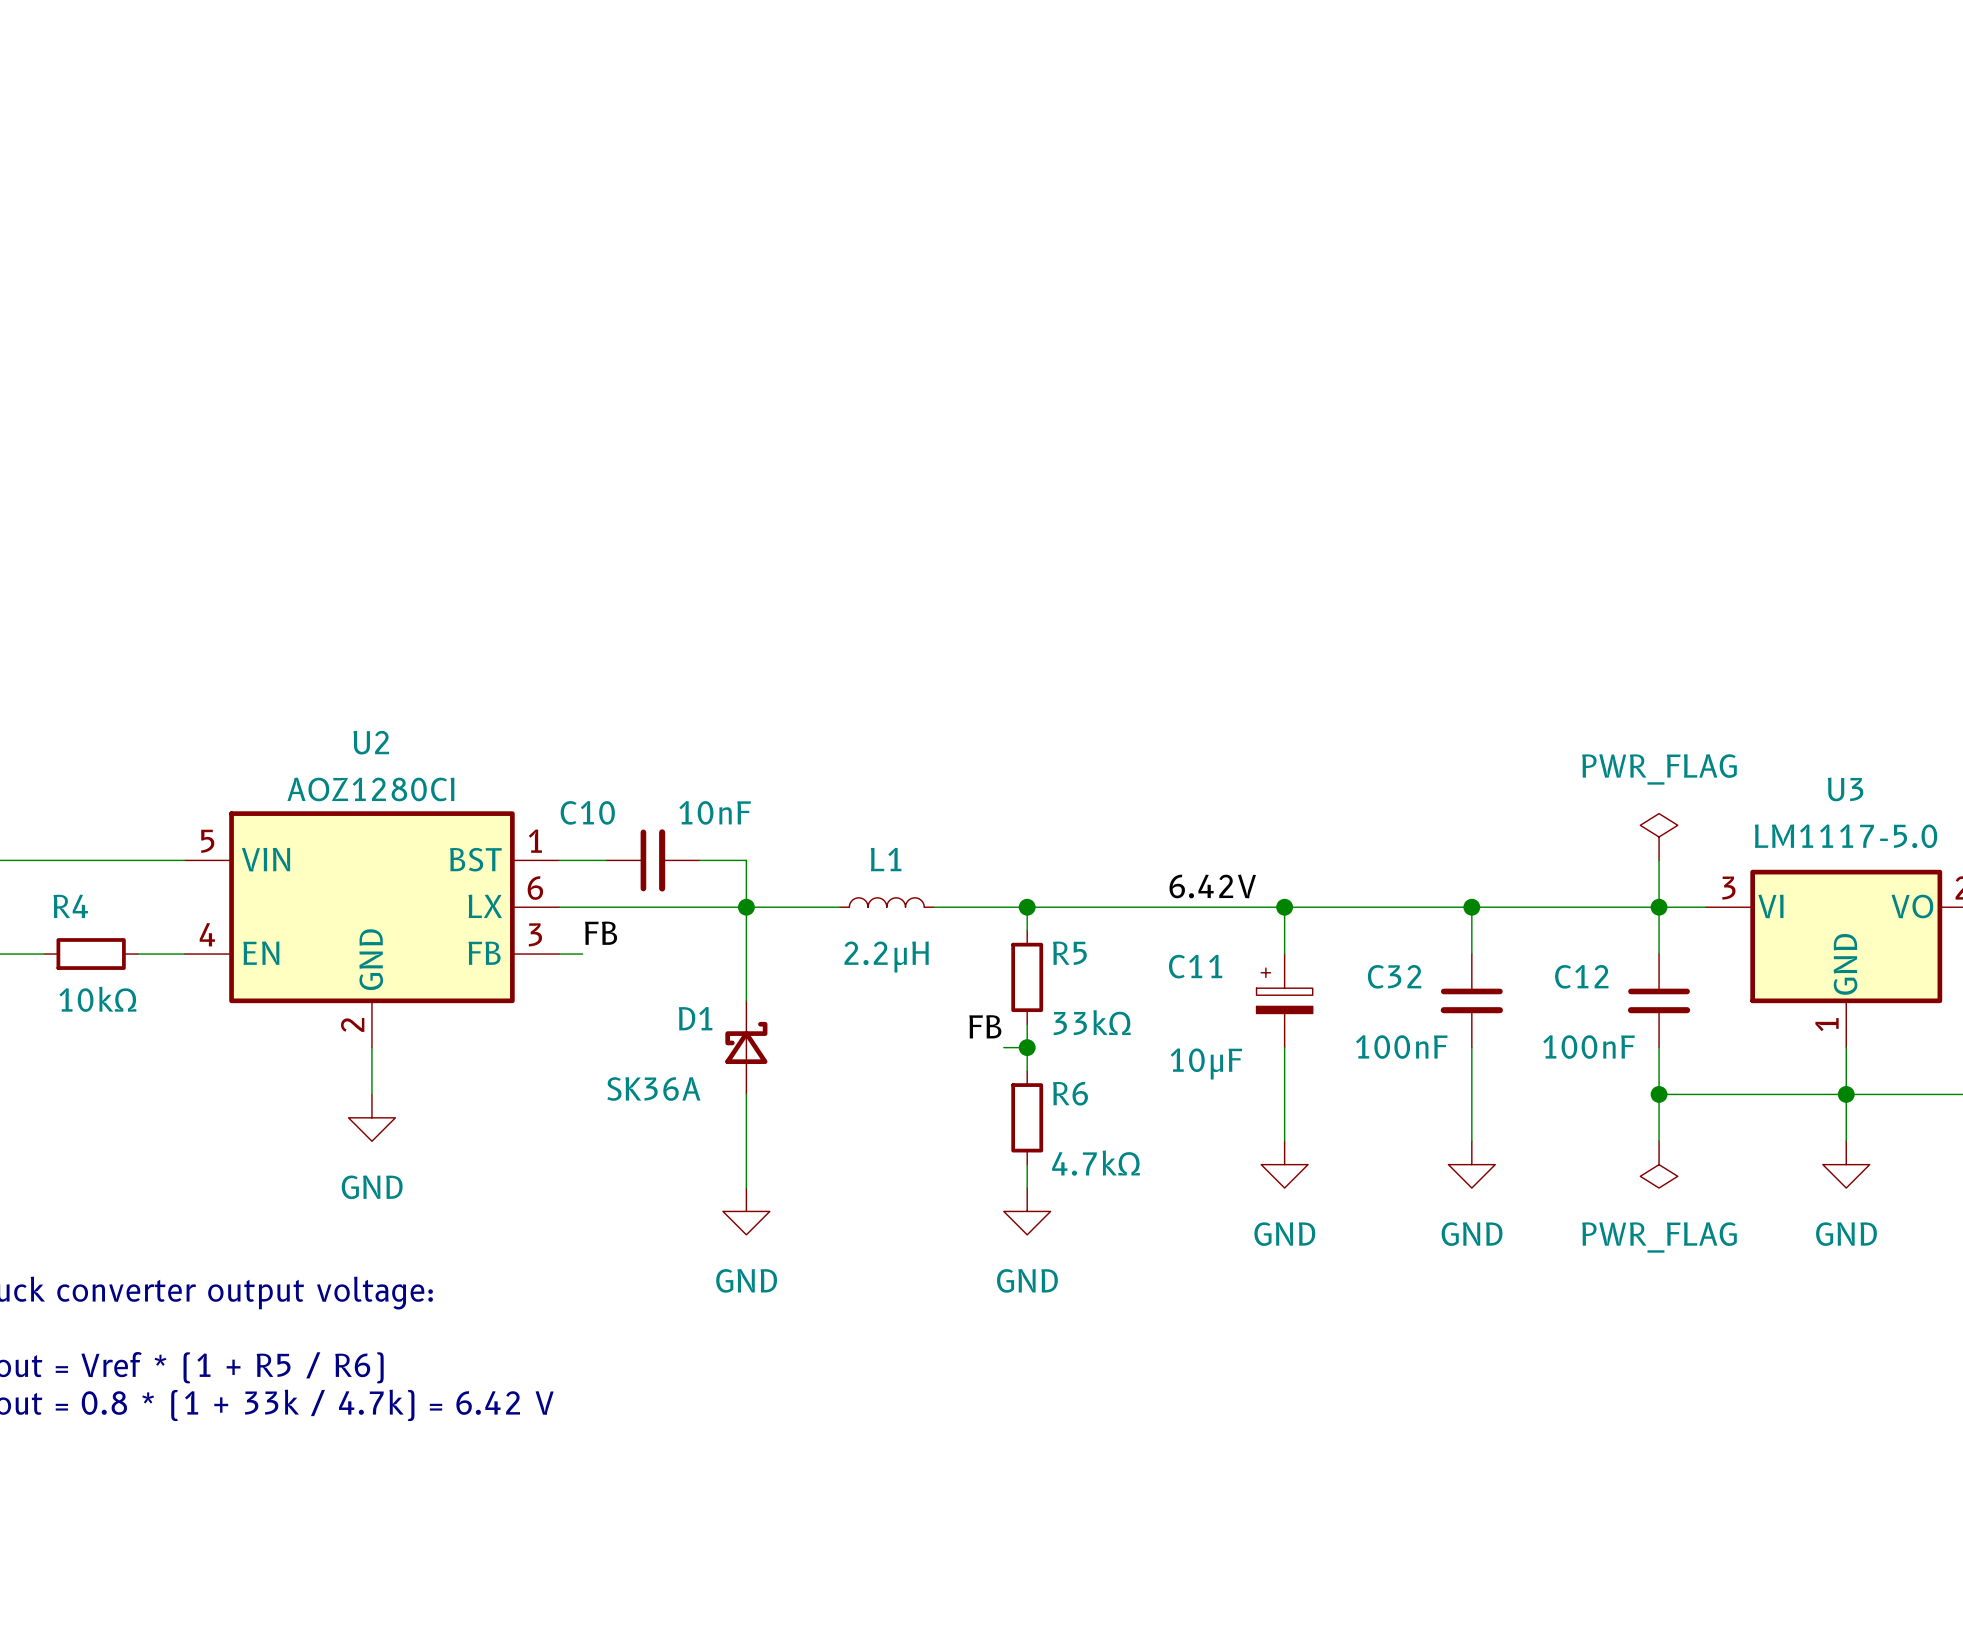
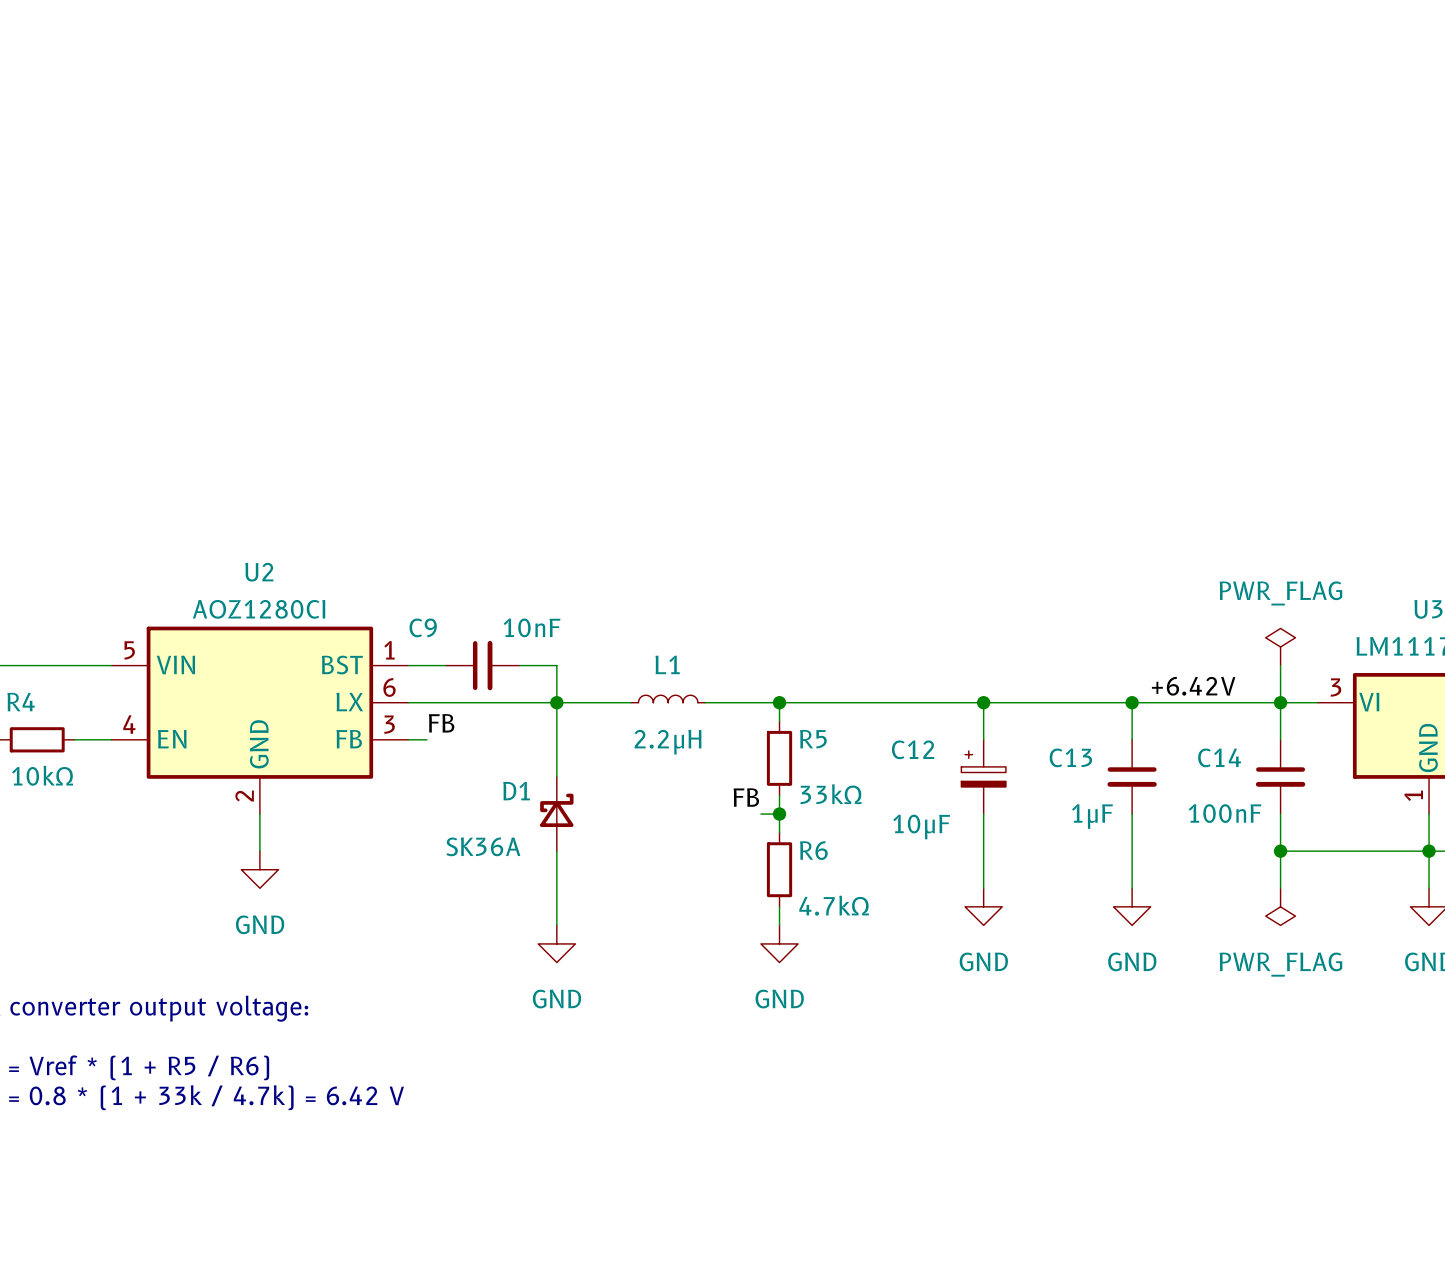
C10 name: C10 (587, 812) -> C9 (423, 627)
label: 6.42V (1212, 886) -> none
label: none -> +6.42V (1193, 686)
C11 name: C11 (1195, 966) -> C12 (913, 749)
C32 name: C32 (1394, 976) -> C13 (1070, 757)
C12 name: C12 (1581, 976) -> C14 (1219, 757)
C32 value: 100nF (1401, 1047) -> 1μF (1092, 816)

